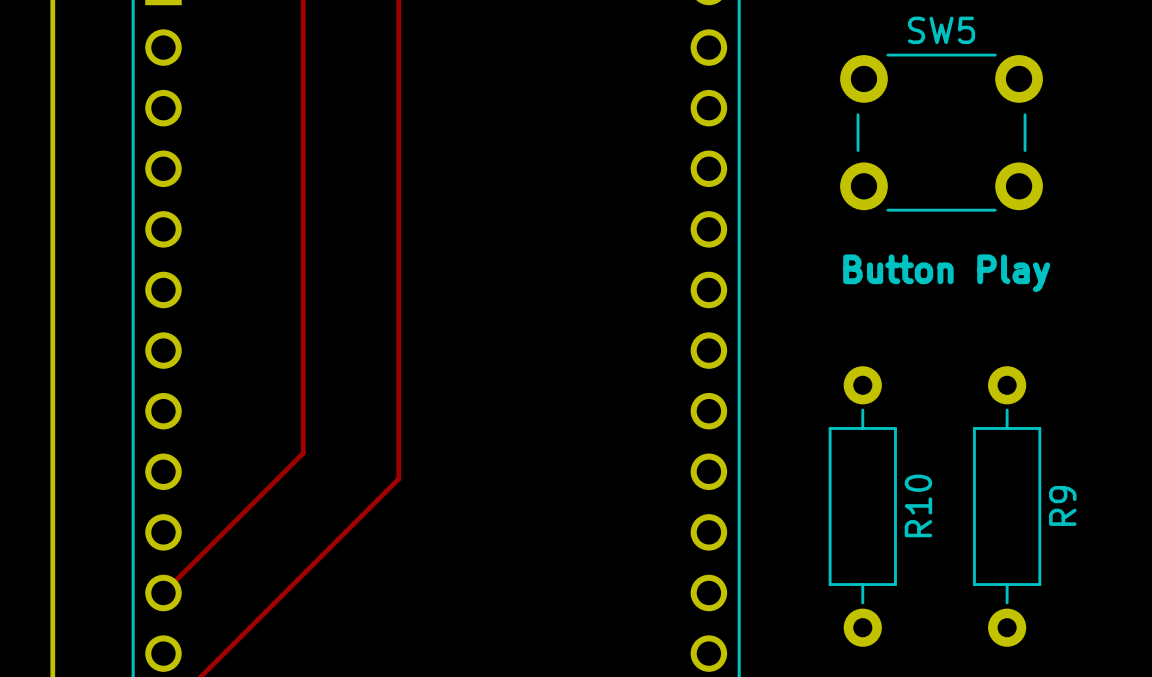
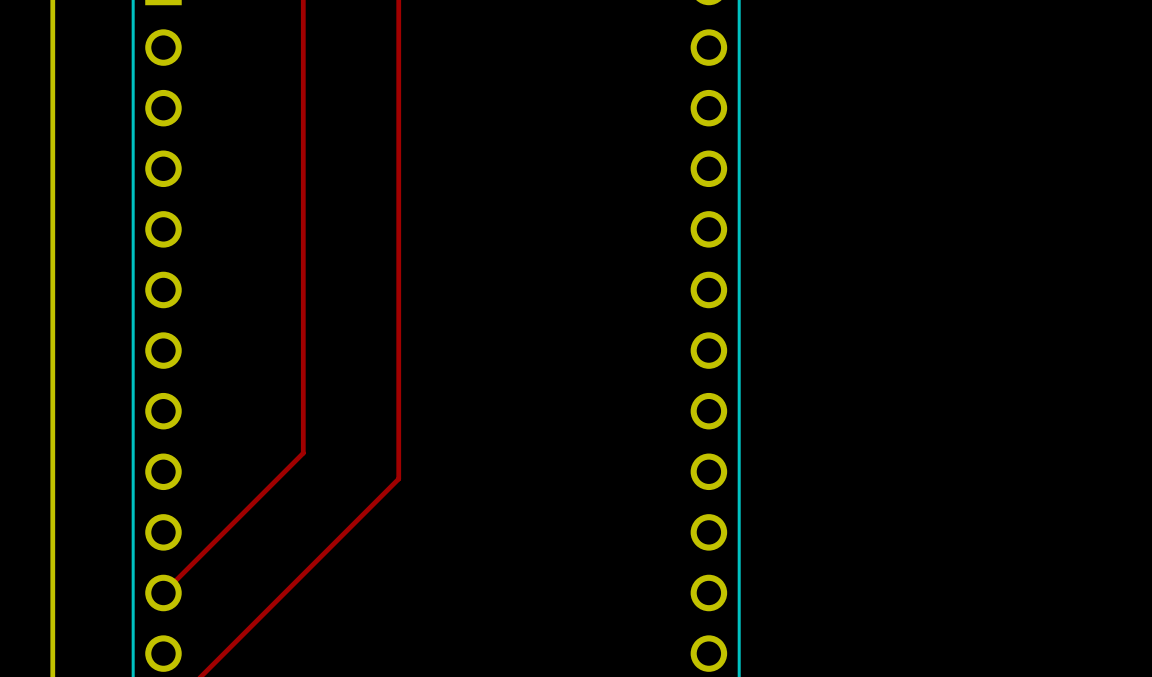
SW5: (941, 132) -> none
text: Button Play (946, 273) -> none
R10: (862, 506) -> none
R9: (1007, 506) -> none

